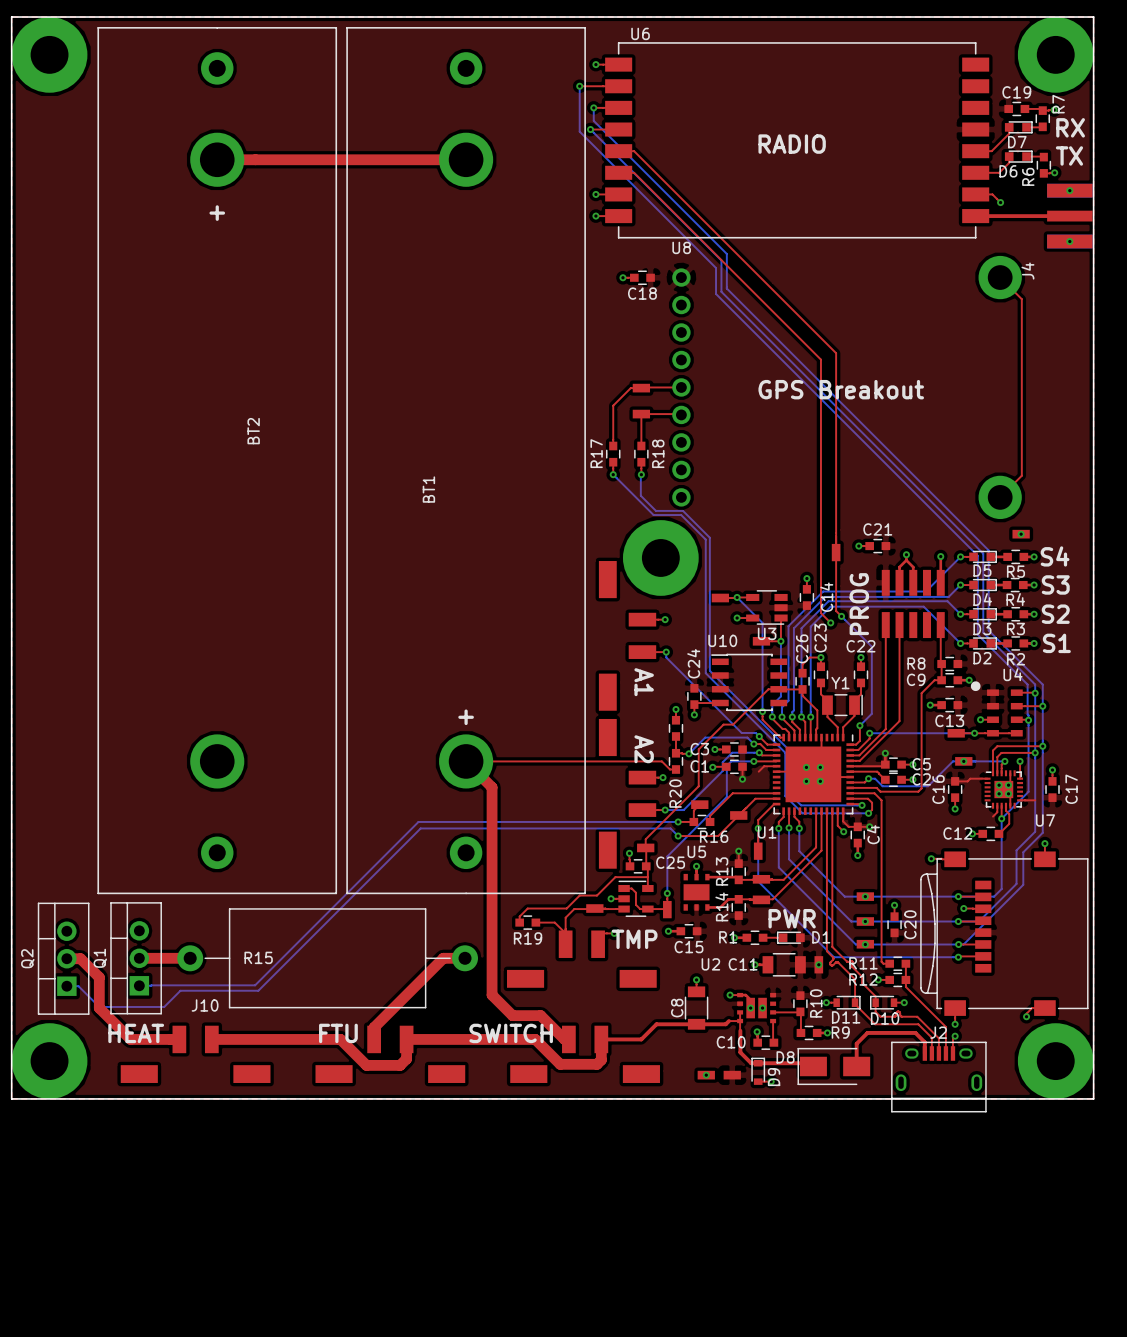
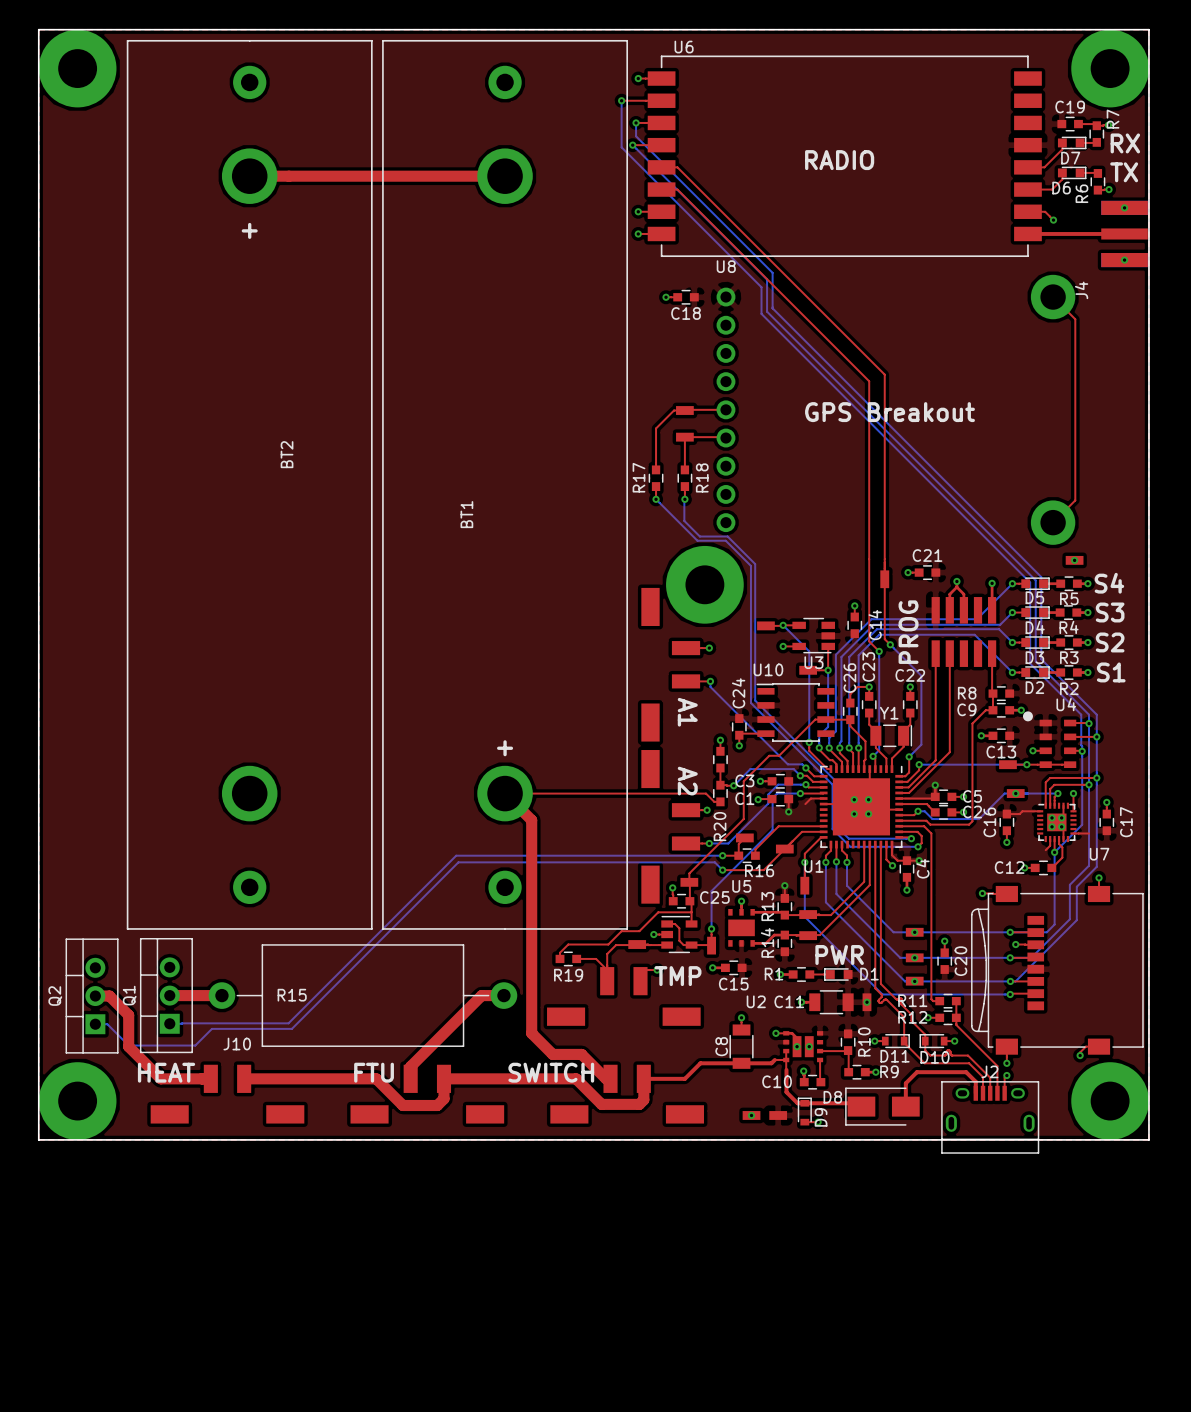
bottom track: none -> (879, 651) (879, 750) (873, 756)
top track: none -> (873, 756) (875, 758) (875, 769)
via: none -> (873, 756)

